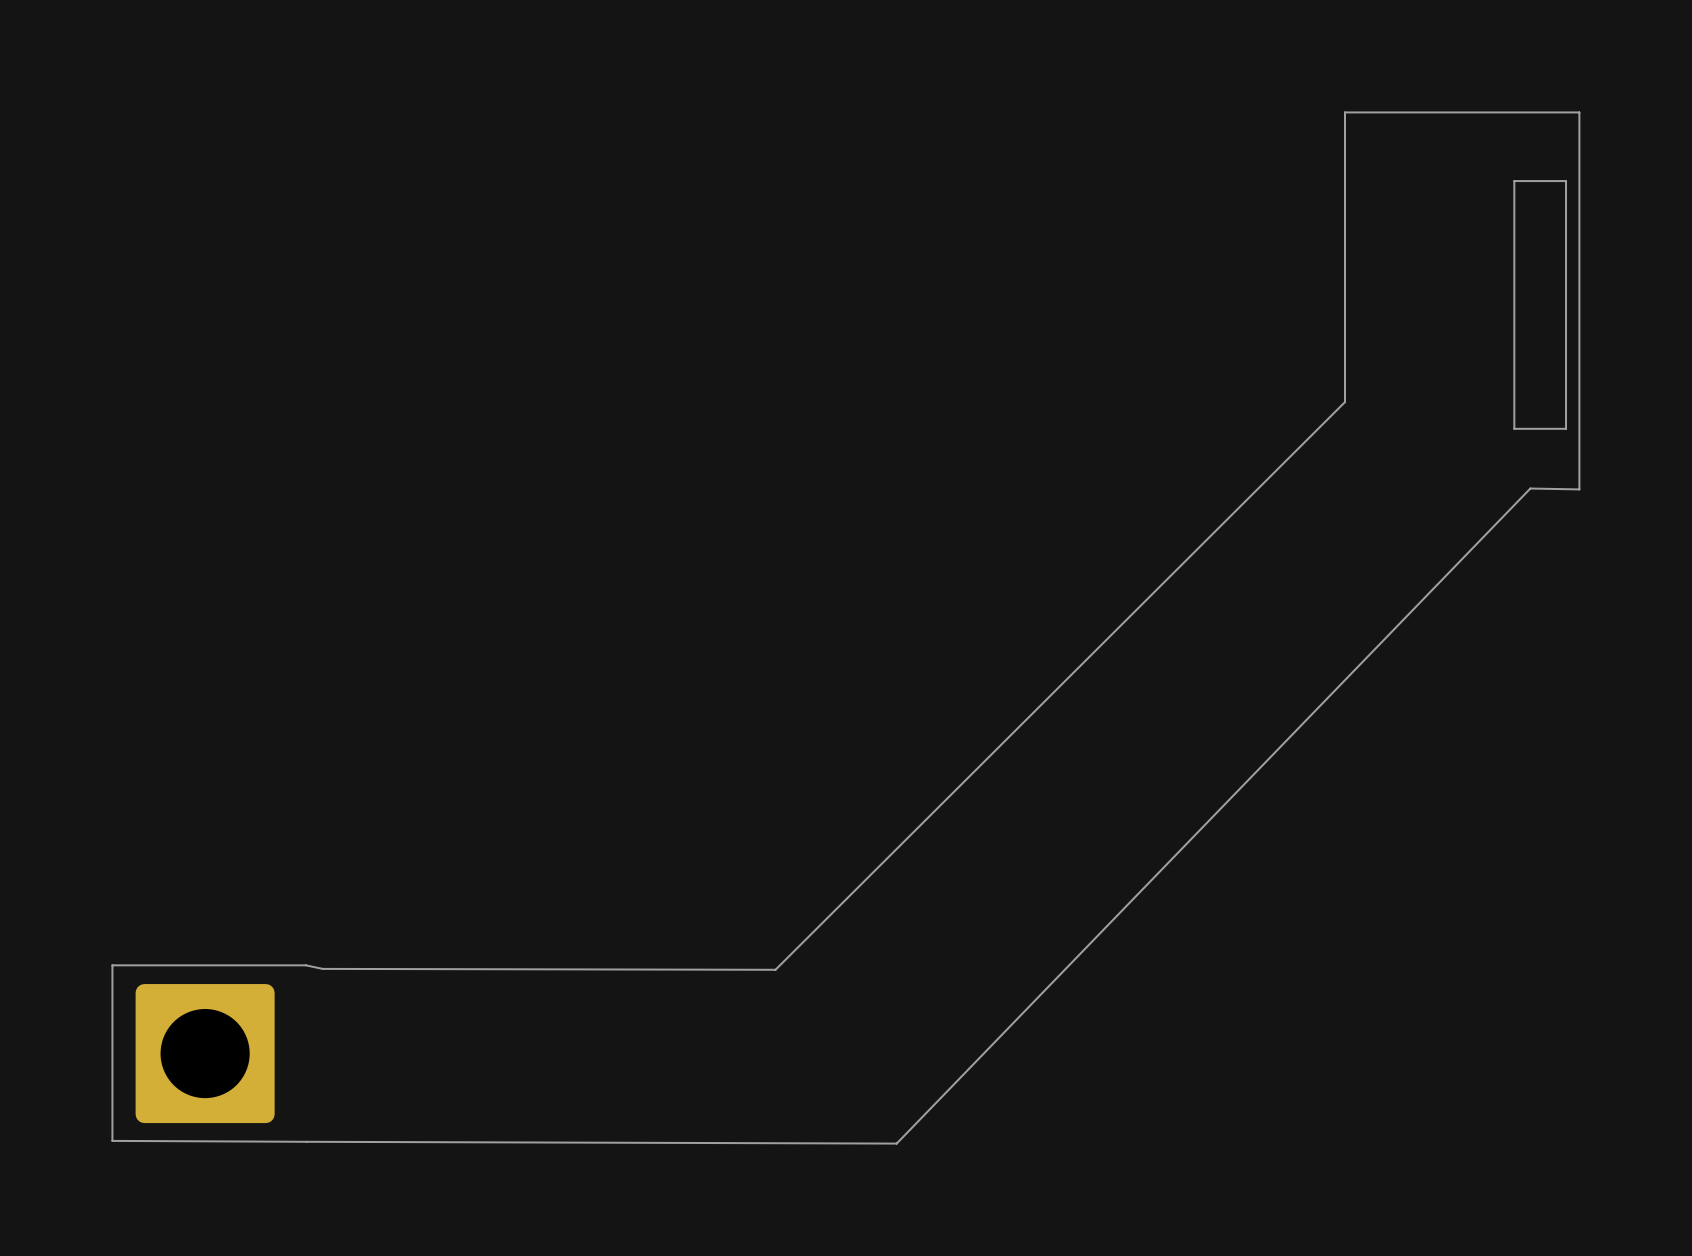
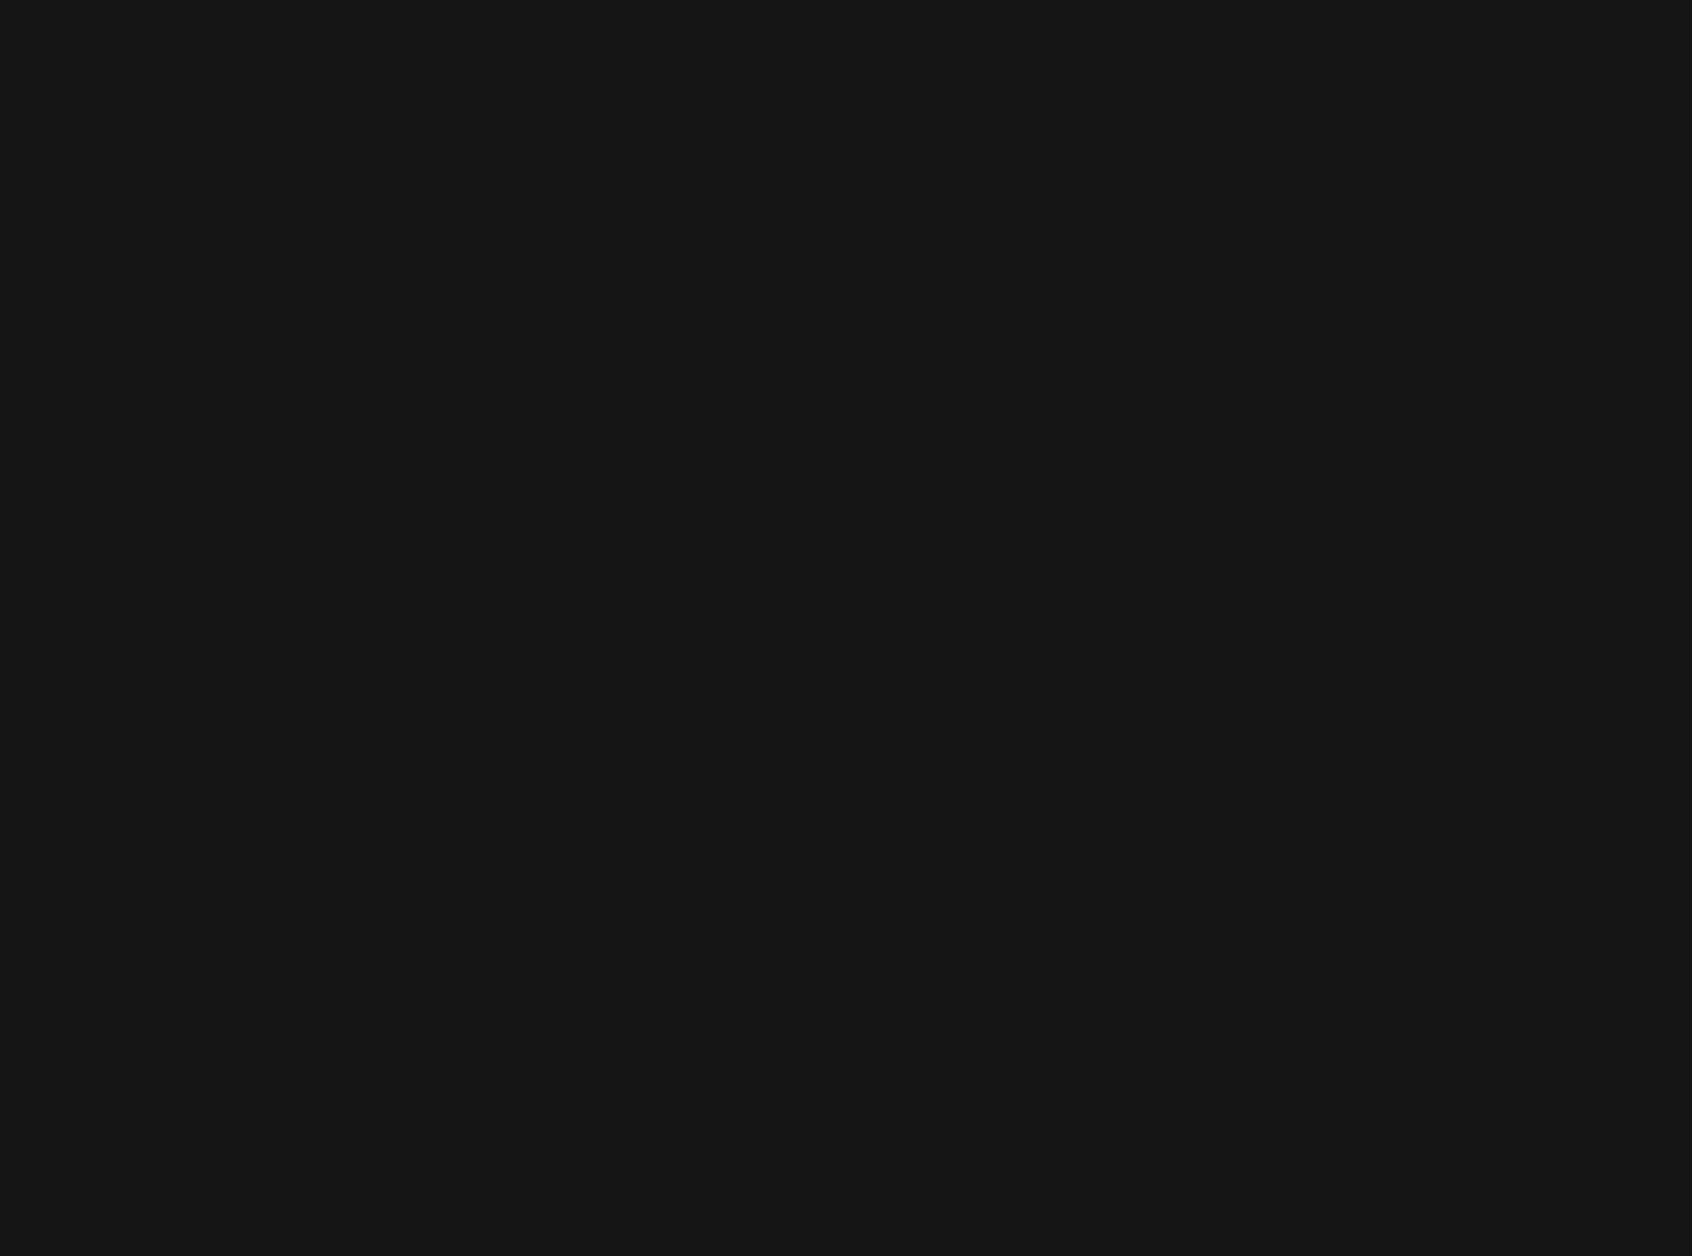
board edge: (1579, 112) (1579, 489) (1530, 488) (896, 1143) (112, 1140) (112, 965) (305, 965) (322, 968) (775, 969) (1344, 402) (1344, 112) (1579, 112) -> none
board edge: (1566, 181) (1514, 181) (1514, 428) (1566, 428) (1566, 181) -> none
part: (205, 1053) -> none

